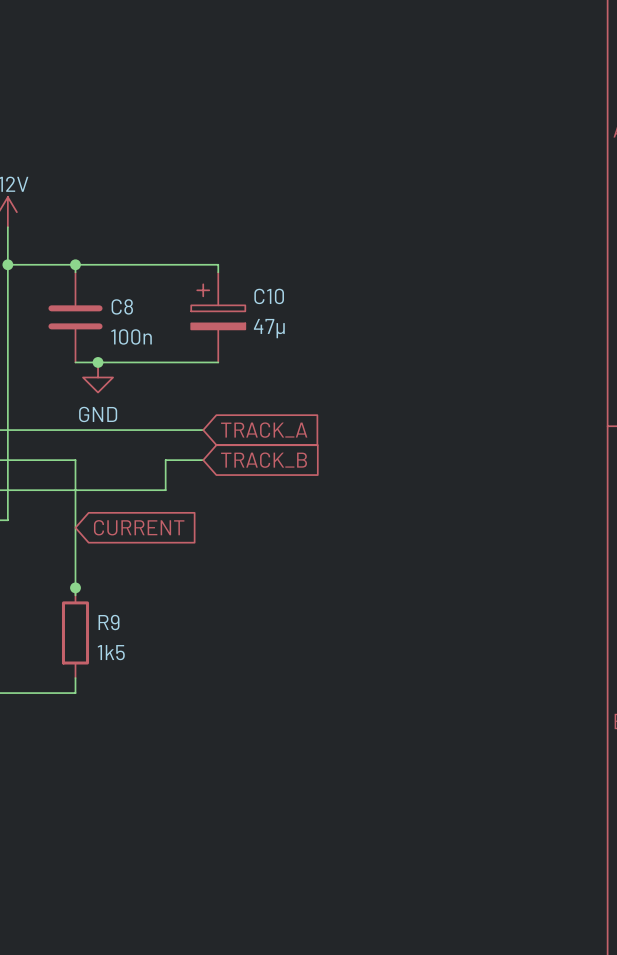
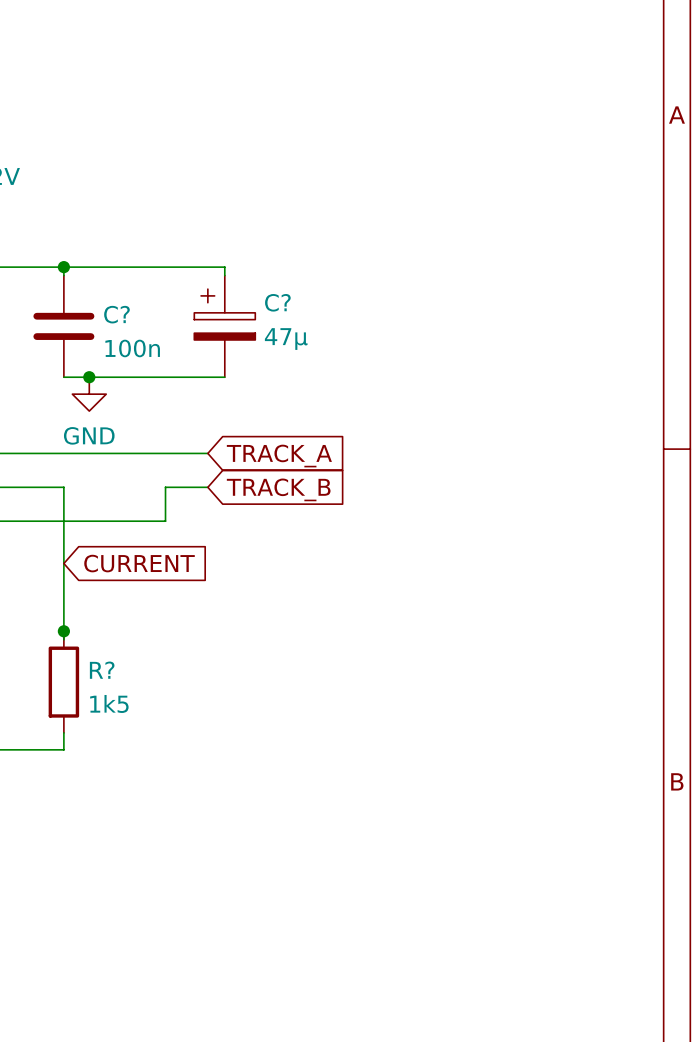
C10 name: C10 (269, 296) -> C? (277, 302)
C8 name: C8 (122, 306) -> C? (116, 314)
R9 name: R9 (109, 622) -> R? (102, 670)

